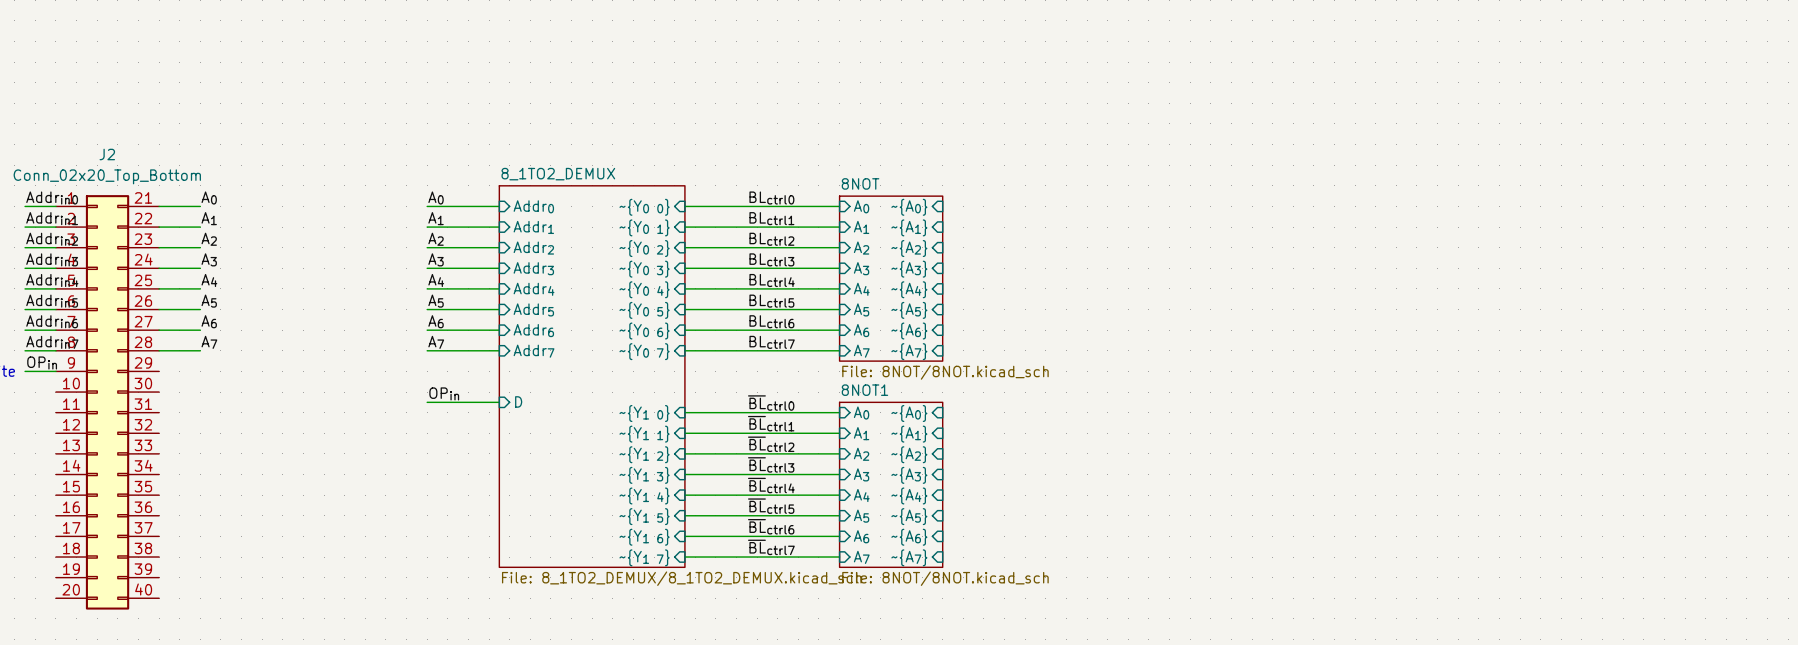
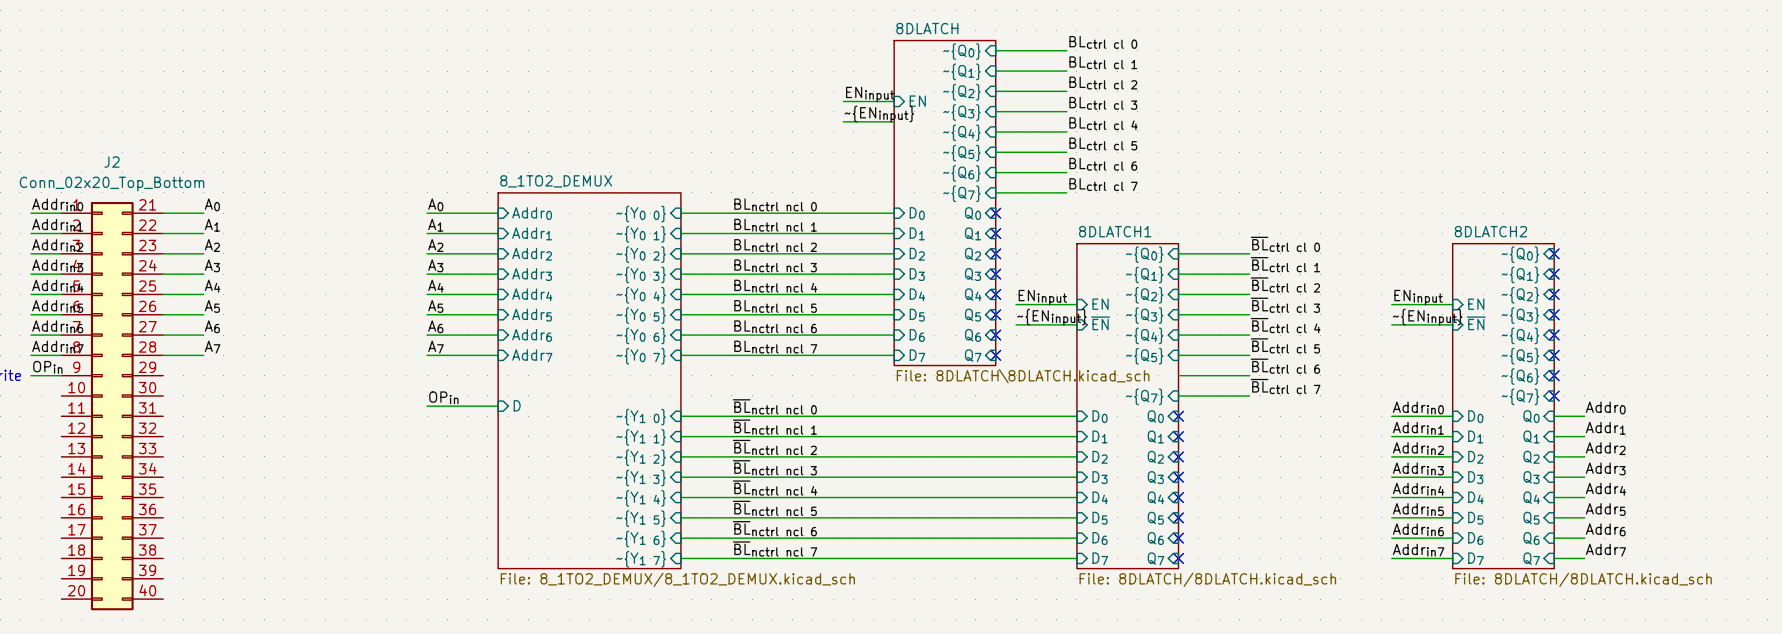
label: none -> BLctrl cl 0 (1103, 42)
wire: none -> (995, 50) (1066, 50)
sheet pin: none -> ~{Q0} (961, 51)
label: none -> BLctrl cl 1 (1103, 62)
sheet pin: none -> ~{Q1} (961, 71)
wire: none -> (995, 71) (1066, 71)
label: none -> BLctrl cl 2 (1103, 83)
wire: none -> (995, 91) (1066, 91)
sheet pin: none -> ~{Q2} (961, 92)
label: none -> ENinput (870, 94)
sheet pin: none -> EN (917, 101)
wire: none -> (843, 101) (894, 101)
label: none -> BLctrl cl 3 (1103, 103)
wire: none -> (995, 111) (1066, 111)
sheet pin: none -> ~{Q3} (961, 112)
label: none -> ~{ENinput} (879, 114)
wire: none -> (843, 121) (894, 121)
label: none -> BLctrl cl 4 (1103, 123)
wire: none -> (995, 131) (1066, 131)
sheet pin: none -> ~{Q4} (961, 132)
label: none -> BLctrl cl 5 (1103, 143)
wire: none -> (995, 152) (1066, 152)
sheet pin: none -> ~{Q5} (961, 153)
label: none -> BLctrl cl 6 (1103, 164)
wire: none -> (995, 172) (1066, 172)
sheet pin: none -> ~{Q6} (961, 173)
label: none -> BLctrl cl 7 (1103, 184)
wire: none -> (995, 192) (1066, 192)
sheet pin: none -> ~{Q7} (961, 193)
sheet 8DLATCH: none -> File: 8DLATCH\8DLATCH.kicad_sch (944, 203)
label: BLctrl0 (771, 198) -> BLnctrl ncl 0 (775, 204)
wire: none -> (833, 213) (894, 213)
sheet pin: A0 (861, 206) -> none
sheet pin: none -> Q0 (973, 213)
no-connect mark: none -> (995, 213)
sheet pin: ~{A0} (909, 207) -> D0 (917, 213)
label: BLctrl1 (771, 218) -> BLnctrl ncl 1 (775, 225)
wire: none -> (833, 233) (894, 233)
sheet pin: A1 (861, 227) -> none
sheet pin: ~{A1} (909, 227) -> D1 (917, 233)
sheet pin: none -> Q1 (973, 233)
no-connect mark: none -> (995, 233)
label: none -> ~{BL}ctrl cl 0 (1285, 244)
label: BLctrl2 (771, 239) -> BLnctrl ncl 2 (775, 245)
wire: none -> (833, 253) (894, 253)
no-connect mark: none -> (995, 253)
wire: none -> (1178, 253) (1249, 253)
no-connect mark: none -> (1554, 253)
sheet pin: A2 (861, 248) -> none
sheet pin: ~{A2} (909, 248) -> D2 (917, 254)
sheet pin: none -> Q2 (973, 254)
sheet pin: none -> ~{Q0} (1144, 254)
sheet pin: none -> ~{Q0} (1520, 254)
label: none -> ~{BL}ctrl cl 1 (1285, 264)
label: BLctrl3 (771, 259) -> BLnctrl ncl 3 (775, 265)
wire: none -> (833, 274) (894, 274)
sheet pin: A3 (861, 268) -> none
sheet pin: none -> Q3 (973, 274)
no-connect mark: none -> (995, 274)
wire: none -> (1178, 274) (1249, 274)
no-connect mark: none -> (1554, 274)
sheet pin: ~{A3} (909, 269) -> D3 (917, 274)
sheet pin: none -> ~{Q1} (1144, 274)
sheet pin: none -> ~{Q1} (1520, 274)
sheet 8NOT: File: 8NOT/8NOT.kicad_sch (891, 278) -> none
label: none -> ~{BL}ctrl cl 2 (1285, 284)
label: BLctrl4 (772, 280) -> BLnctrl ncl 4 (775, 286)
wire: none -> (833, 294) (894, 294)
no-connect mark: none -> (995, 294)
wire: none -> (1178, 294) (1249, 294)
no-connect mark: none -> (1554, 294)
sheet pin: A4 (861, 289) -> none
sheet pin: ~{A4} (909, 289) -> D4 (917, 294)
sheet pin: none -> Q4 (973, 294)
sheet pin: none -> ~{Q2} (1144, 295)
sheet pin: none -> ~{Q2} (1520, 295)
label: none -> ENinput (1042, 297)
label: none -> ENinput (1418, 297)
sheet pin: none -> EN (1100, 304)
sheet pin: none -> EN (1476, 304)
wire: none -> (1016, 304) (1076, 304)
label: none -> ~{BL}ctrl cl 3 (1285, 305)
wire: none -> (1391, 304) (1452, 304)
label: BLctrl5 (771, 301) -> BLnctrl ncl 5 (775, 306)
wire: none -> (833, 314) (894, 314)
sheet pin: A5 (861, 309) -> none
sheet pin: none -> Q5 (973, 315)
no-connect mark: none -> (995, 314)
wire: none -> (1178, 314) (1249, 314)
no-connect mark: none -> (1554, 314)
sheet pin: ~{A5} (909, 310) -> D5 (917, 315)
sheet pin: none -> ~{Q3} (1144, 315)
sheet pin: none -> ~{Q3} (1520, 315)
label: none -> ~{ENinput} (1051, 317)
label: none -> ~{ENinput} (1427, 317)
sheet pin: none -> ~{EN} (1100, 323)
sheet pin: none -> ~{EN} (1476, 323)
wire: none -> (1016, 324) (1076, 324)
wire: none -> (1391, 324) (1452, 324)
label: none -> ~{BL}ctrl cl 4 (1285, 325)
label: BLctrl6 (771, 321) -> BLnctrl ncl 6 (775, 326)
wire: none -> (833, 335) (894, 335)
sheet pin: A6 (861, 330) -> none
sheet pin: none -> Q6 (973, 335)
no-connect mark: none -> (995, 335)
wire: none -> (1178, 335) (1249, 335)
no-connect mark: none -> (1554, 335)
sheet pin: ~{A6} (909, 331) -> D6 (917, 335)
sheet pin: none -> ~{Q4} (1144, 335)
sheet pin: none -> ~{Q4} (1520, 335)
label: none -> ~{BL}ctrl cl 5 (1285, 345)
label: BLctrl7 (772, 342) -> BLnctrl ncl 7 (775, 347)
wire: none -> (833, 355) (894, 355)
no-connect mark: none -> (995, 355)
wire: none -> (1178, 355) (1249, 355)
no-connect mark: none -> (1554, 355)
sheet pin: A7 (861, 351) -> none
sheet pin: ~{A7} (909, 351) -> D7 (917, 355)
sheet pin: none -> Q7 (973, 355)
sheet pin: none -> ~{Q5} (1144, 356)
sheet pin: none -> ~{Q5} (1520, 356)
label: none -> ~{BL}ctrl cl 6 (1285, 366)
wire: none -> (1178, 375) (1249, 375)
no-connect mark: none -> (1554, 375)
sheet pin: none -> ~{Q6} (1520, 376)
label: none -> ~{BL}ctrl cl 7 (1285, 386)
sheet pin: none -> ~{Q7} (1144, 396)
wire: none -> (1178, 395) (1249, 395)
sheet pin: none -> ~{Q7} (1520, 396)
no-connect mark: none -> (1554, 395)
sheet 8DLATCH1: none -> File: 8DLATCH/8DLATCH.kicad_sch (1127, 406)
sheet 8DLATCH2: none -> File: 8DLATCH/8DLATCH.kicad_sch (1503, 406)
label: ~{BL}ctrl0 (771, 403) -> ~{BL}nctrl ncl 0 (774, 406)
label: none -> Addrin0 (1418, 407)
label: none -> Addr0 (1605, 407)
wire: none -> (833, 416) (1076, 416)
no-connect mark: none -> (1178, 416)
wire: none -> (1391, 416) (1452, 416)
wire: none -> (1554, 416) (1584, 416)
sheet pin: A0 (861, 413) -> none
sheet pin: ~{A0} (909, 413) -> none
sheet pin: none -> D0 (1100, 416)
sheet pin: none -> Q0 (1155, 416)
sheet pin: none -> D0 (1475, 416)
sheet pin: none -> Q0 (1531, 416)
label: ~{BL}ctrl1 (771, 423) -> ~{BL}nctrl ncl 1 (774, 427)
label: none -> Addrin1 (1418, 428)
label: none -> Addr1 (1605, 428)
wire: none -> (833, 436) (1076, 436)
sheet pin: A1 (861, 433) -> none
sheet pin: none -> D1 (1100, 436)
sheet pin: none -> Q1 (1155, 436)
no-connect mark: none -> (1178, 436)
wire: none -> (1391, 436) (1452, 436)
sheet pin: none -> D1 (1475, 436)
sheet pin: none -> Q1 (1531, 436)
wire: none -> (1554, 436) (1584, 436)
sheet pin: ~{A1} (909, 434) -> none
label: ~{BL}ctrl2 (771, 444) -> ~{BL}nctrl ncl 2 (774, 447)
label: none -> Addrin2 (1418, 448)
label: none -> Addr2 (1605, 448)
wire: none -> (833, 456) (1076, 456)
no-connect mark: none -> (1178, 456)
wire: none -> (1391, 456) (1452, 456)
wire: none -> (1554, 456) (1584, 456)
sheet pin: A2 (861, 454) -> none
sheet pin: ~{A2} (909, 454) -> none
sheet pin: none -> D2 (1100, 457)
sheet pin: none -> Q2 (1155, 457)
sheet pin: none -> D2 (1475, 457)
sheet pin: none -> Q2 (1531, 457)
label: ~{BL}ctrl3 (771, 464) -> ~{BL}nctrl ncl 3 (774, 467)
label: none -> Addrin3 (1418, 468)
label: none -> Addr3 (1605, 468)
wire: none -> (833, 477) (1076, 477)
sheet pin: A3 (861, 474) -> none
sheet pin: none -> D3 (1100, 477)
sheet pin: none -> Q3 (1155, 477)
no-connect mark: none -> (1178, 477)
wire: none -> (1391, 477) (1452, 477)
sheet pin: none -> D3 (1475, 477)
sheet pin: none -> Q3 (1531, 477)
wire: none -> (1554, 477) (1584, 477)
sheet pin: ~{A3} (909, 475) -> none
sheet 8NOT1: File: 8NOT/8NOT.kicad_sch (891, 484) -> none
label: ~{BL}ctrl4 (771, 485) -> ~{BL}nctrl ncl 4 (775, 488)
label: none -> Addrin4 (1418, 489)
label: none -> Addr4 (1605, 489)
wire: none -> (833, 497) (1076, 497)
sheet pin: A4 (861, 495) -> none
sheet pin: ~{A4} (909, 495) -> none
sheet pin: none -> D4 (1100, 497)
sheet pin: none -> Q4 (1156, 497)
no-connect mark: none -> (1178, 497)
wire: none -> (1391, 497) (1452, 497)
sheet pin: none -> D4 (1475, 497)
sheet pin: none -> Q4 (1531, 497)
wire: none -> (1554, 497) (1584, 497)
label: ~{BL}ctrl5 (771, 506) -> ~{BL}nctrl ncl 5 (774, 508)
label: none -> Addrin5 (1418, 509)
label: none -> Addr5 (1605, 509)
wire: none -> (833, 517) (1076, 517)
no-connect mark: none -> (1178, 517)
wire: none -> (1391, 517) (1452, 517)
wire: none -> (1554, 517) (1584, 517)
sheet pin: A5 (861, 516) -> none
sheet pin: ~{A5} (909, 516) -> none
sheet pin: none -> D5 (1100, 518)
sheet pin: none -> Q5 (1155, 518)
sheet pin: none -> D5 (1475, 518)
sheet pin: none -> Q5 (1531, 518)
label: ~{BL}ctrl6 (771, 526) -> ~{BL}nctrl ncl 6 (774, 528)
label: none -> Addrin6 (1418, 529)
label: none -> Addr6 (1605, 529)
wire: none -> (833, 538) (1076, 538)
sheet pin: A6 (861, 536) -> none
sheet pin: none -> D6 (1100, 538)
sheet pin: none -> Q6 (1155, 538)
no-connect mark: none -> (1178, 538)
wire: none -> (1391, 538) (1452, 538)
sheet pin: none -> D6 (1475, 538)
sheet pin: none -> Q6 (1531, 538)
wire: none -> (1554, 538) (1584, 538)
sheet pin: ~{A6} (909, 537) -> none
label: ~{BL}ctrl7 (771, 547) -> ~{BL}nctrl ncl 7 (775, 548)
label: none -> Addrin7 (1418, 550)
label: none -> Addr7 (1605, 550)
wire: none -> (833, 558) (1076, 558)
sheet pin: A7 (861, 557) -> none
sheet pin: ~{A7} (909, 557) -> none
sheet pin: none -> D7 (1100, 558)
sheet pin: none -> Q7 (1156, 558)
no-connect mark: none -> (1178, 558)
wire: none -> (1391, 558) (1452, 558)
sheet pin: none -> D7 (1475, 558)
sheet pin: none -> Q7 (1531, 558)
wire: none -> (1554, 558) (1584, 558)

